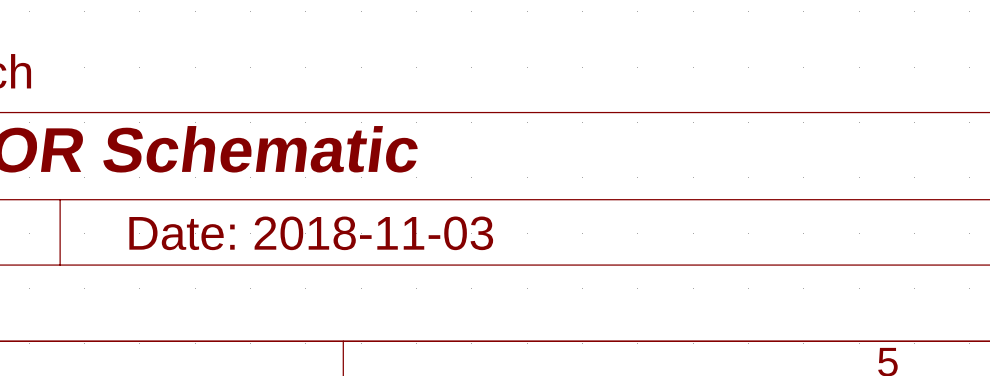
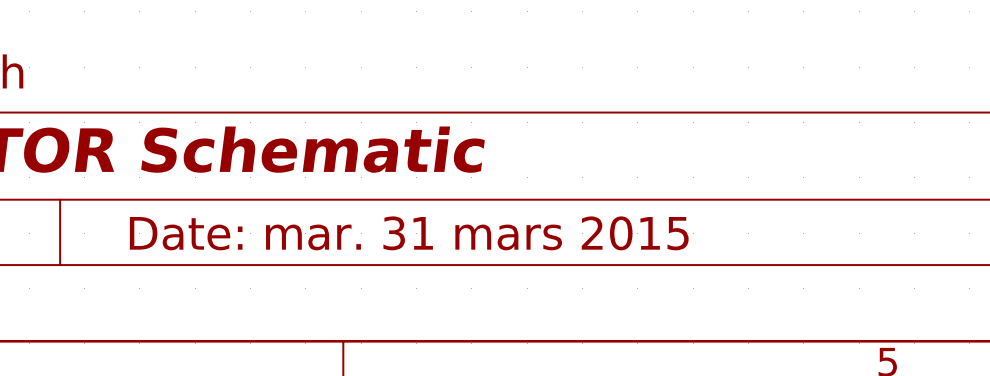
title block: Date: 2018-11-03 (311, 233) -> Date: mar. 31 mars 2015 (409, 233)

